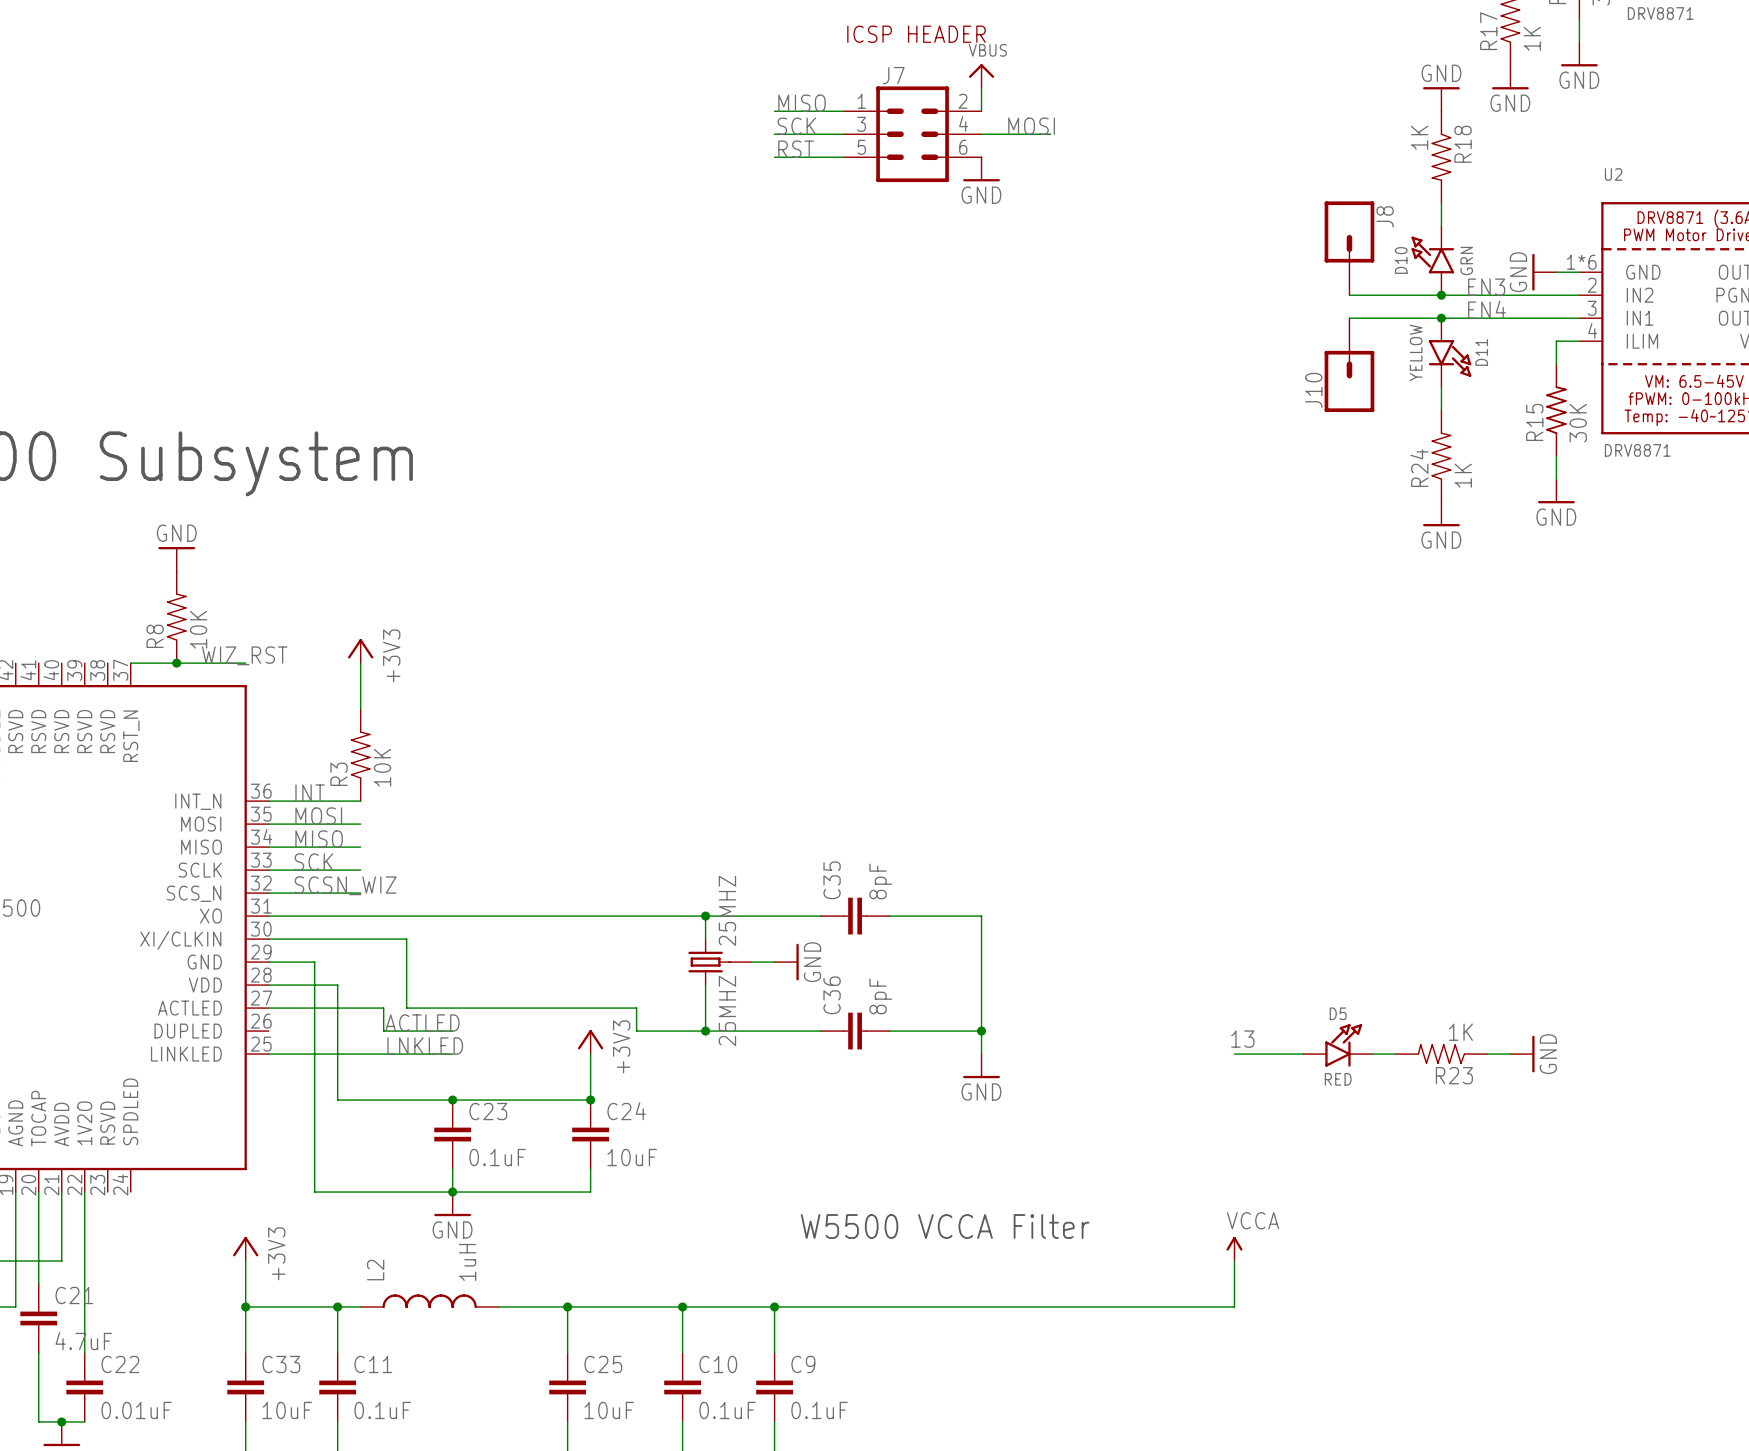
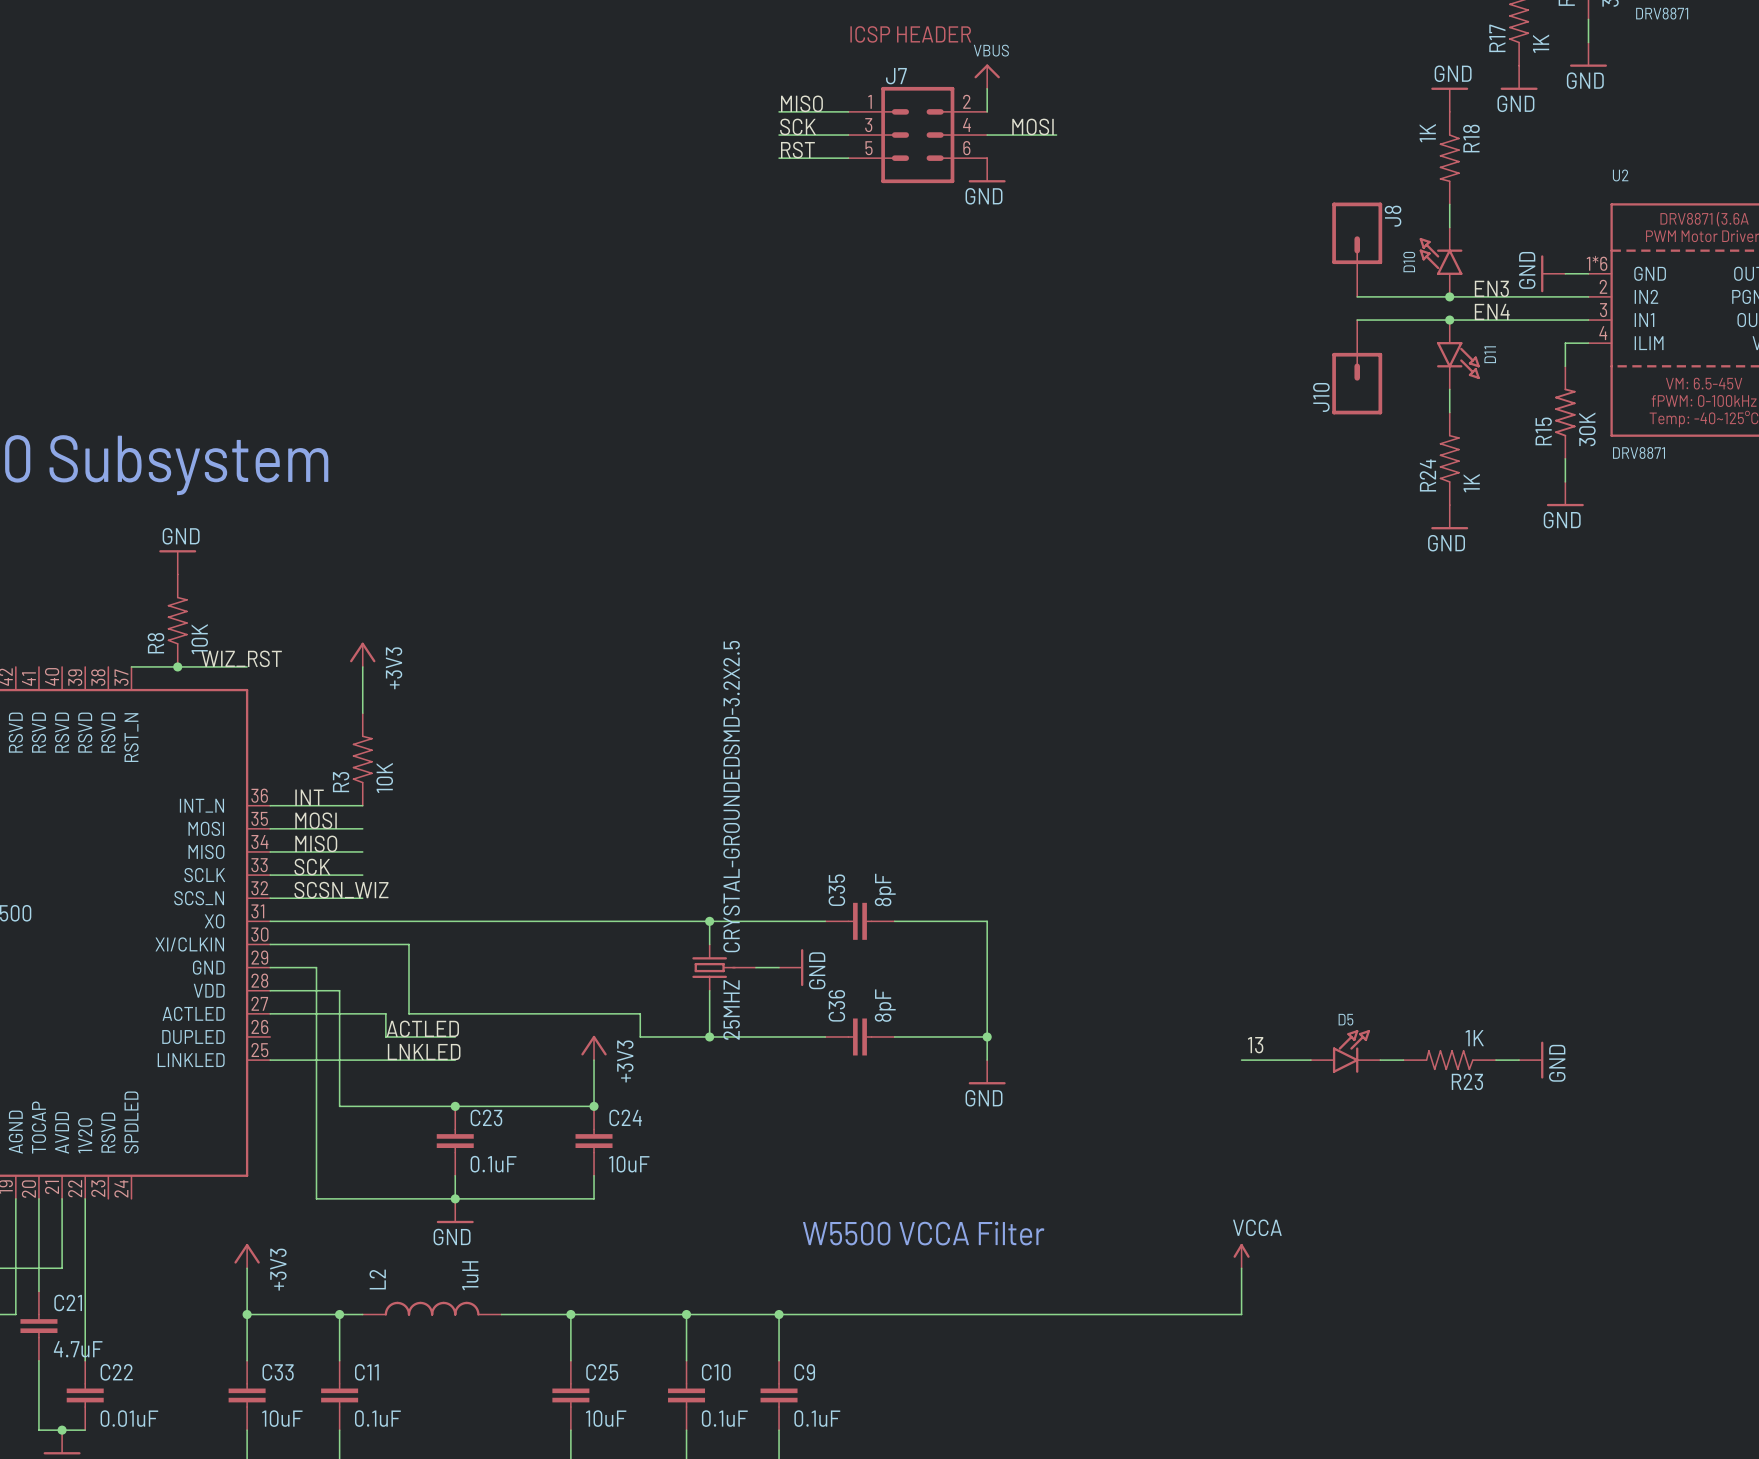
D10 value: GRN (1466, 260) -> none
D11 value: YELLOW (1416, 352) -> none
25MHZ value: 25MHZ (727, 910) -> CRYSTAL-GROUNDEDSMD-3.2X2.5 (731, 796)
D5 value: RED (1338, 1079) -> none

